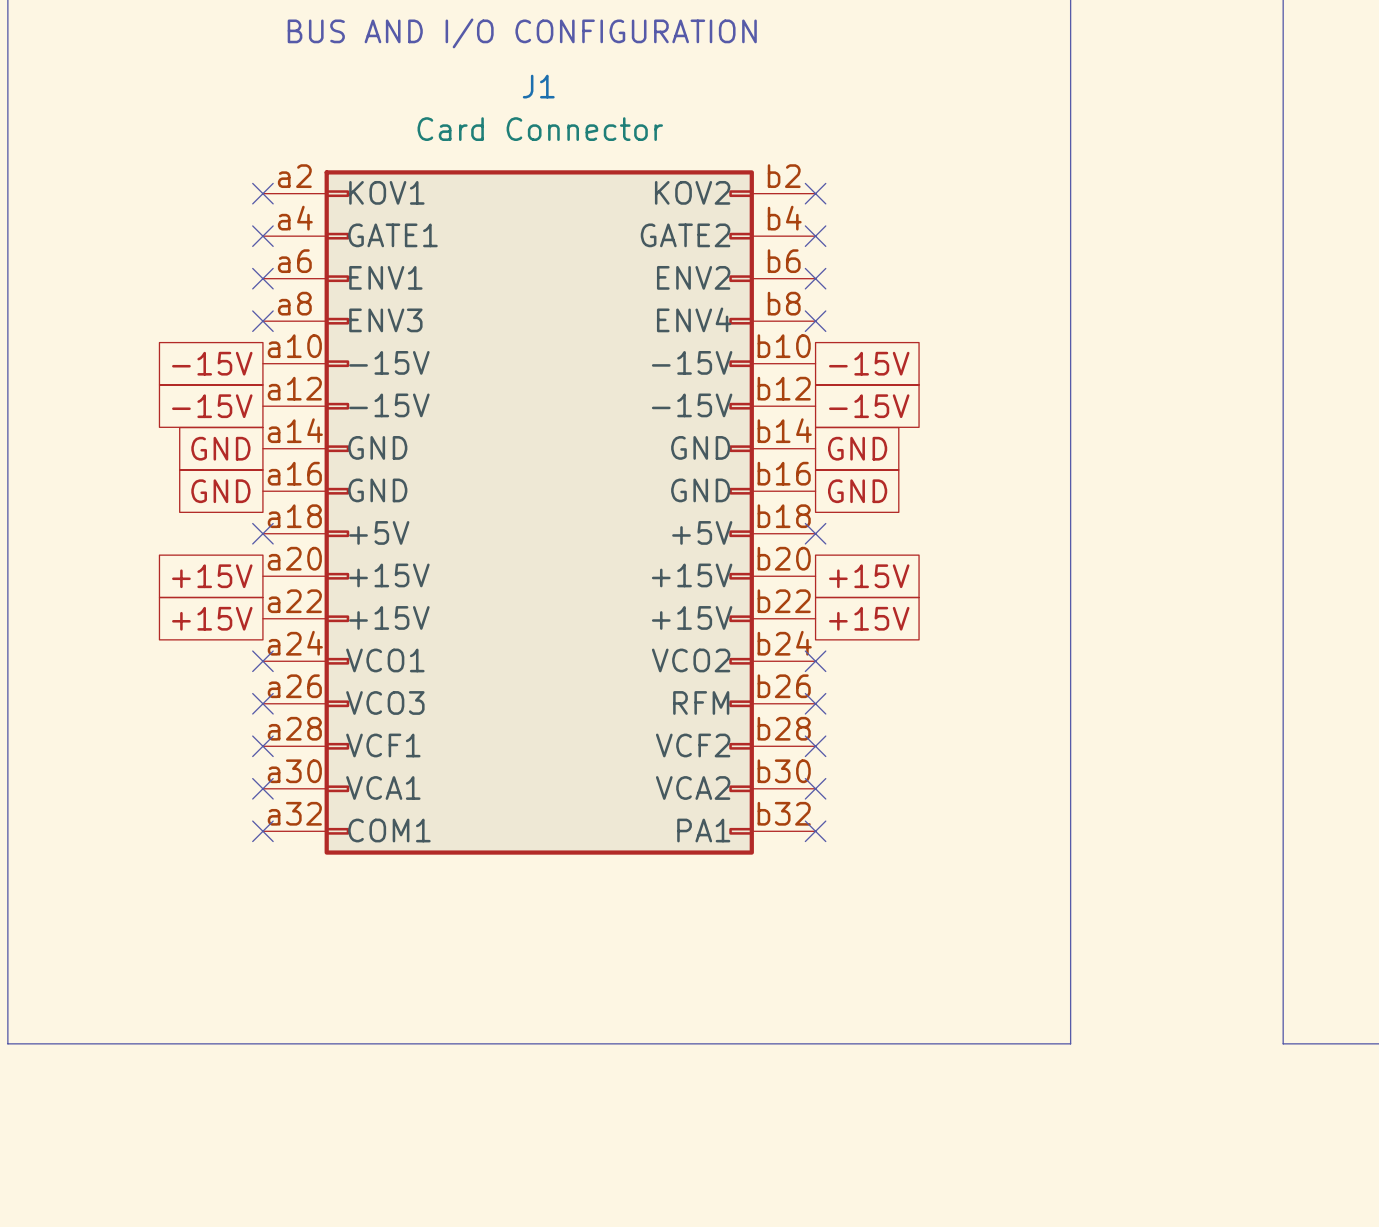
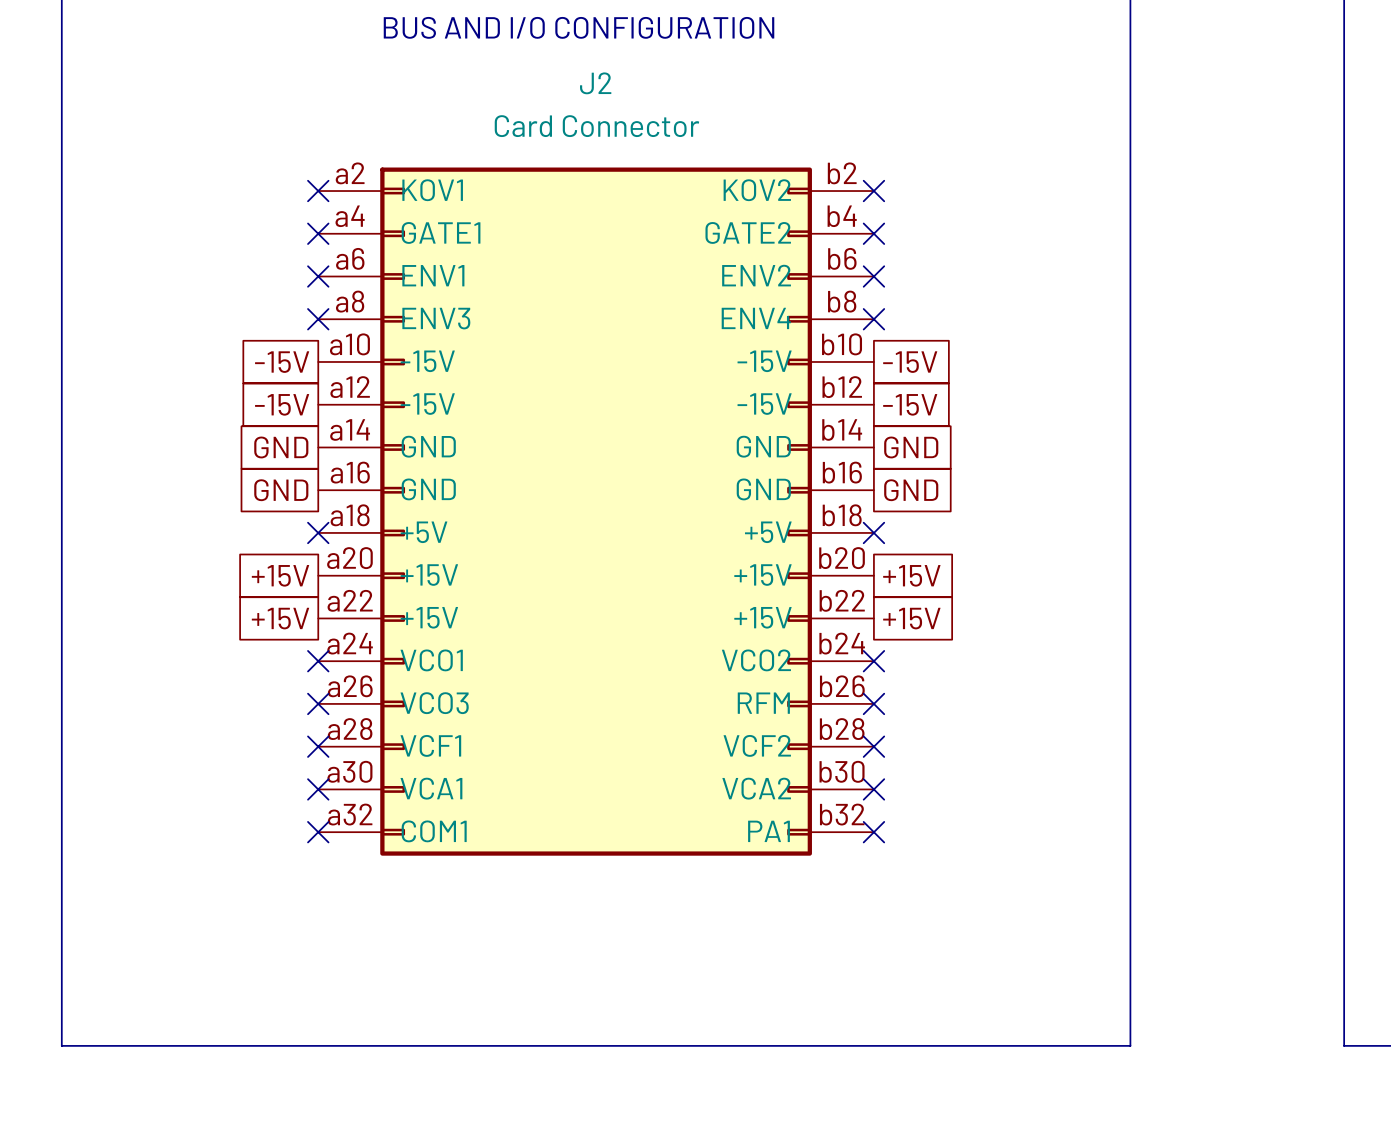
J1 name: J1 (538, 86) -> J2 (595, 83)

